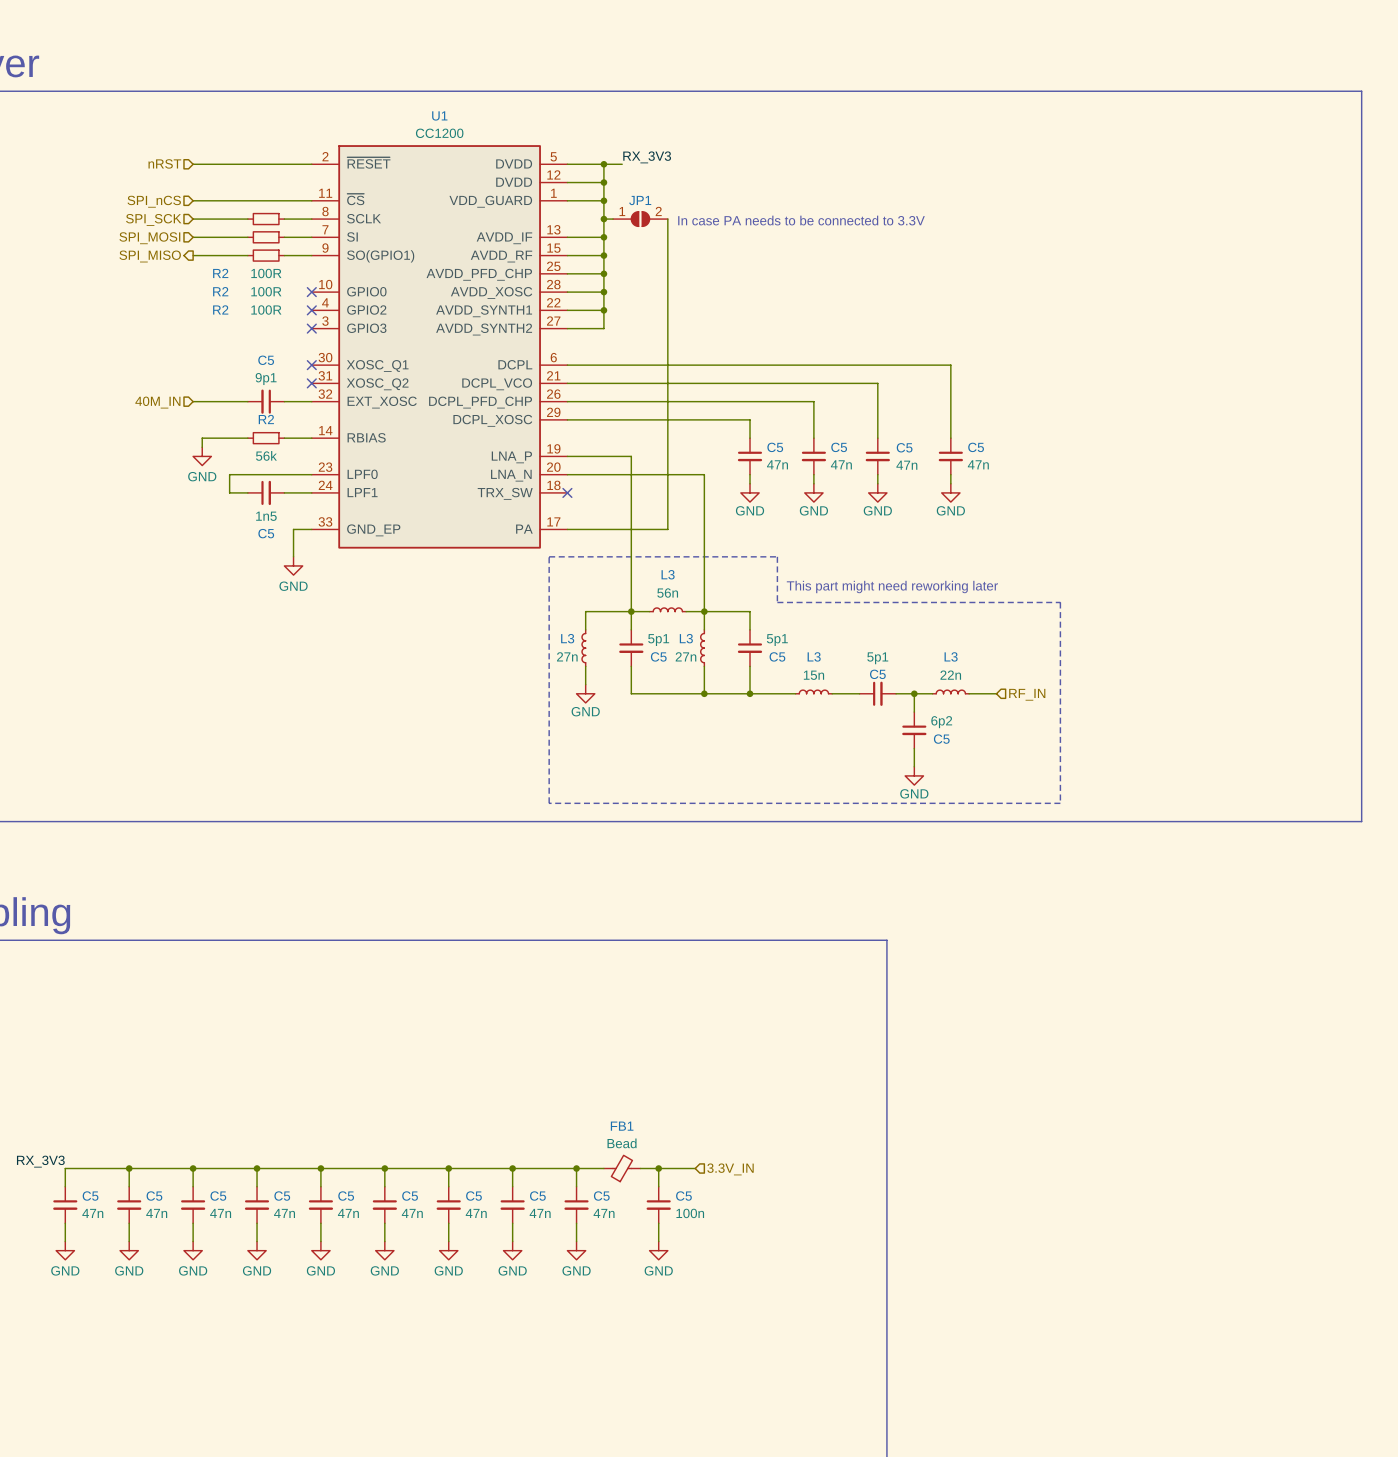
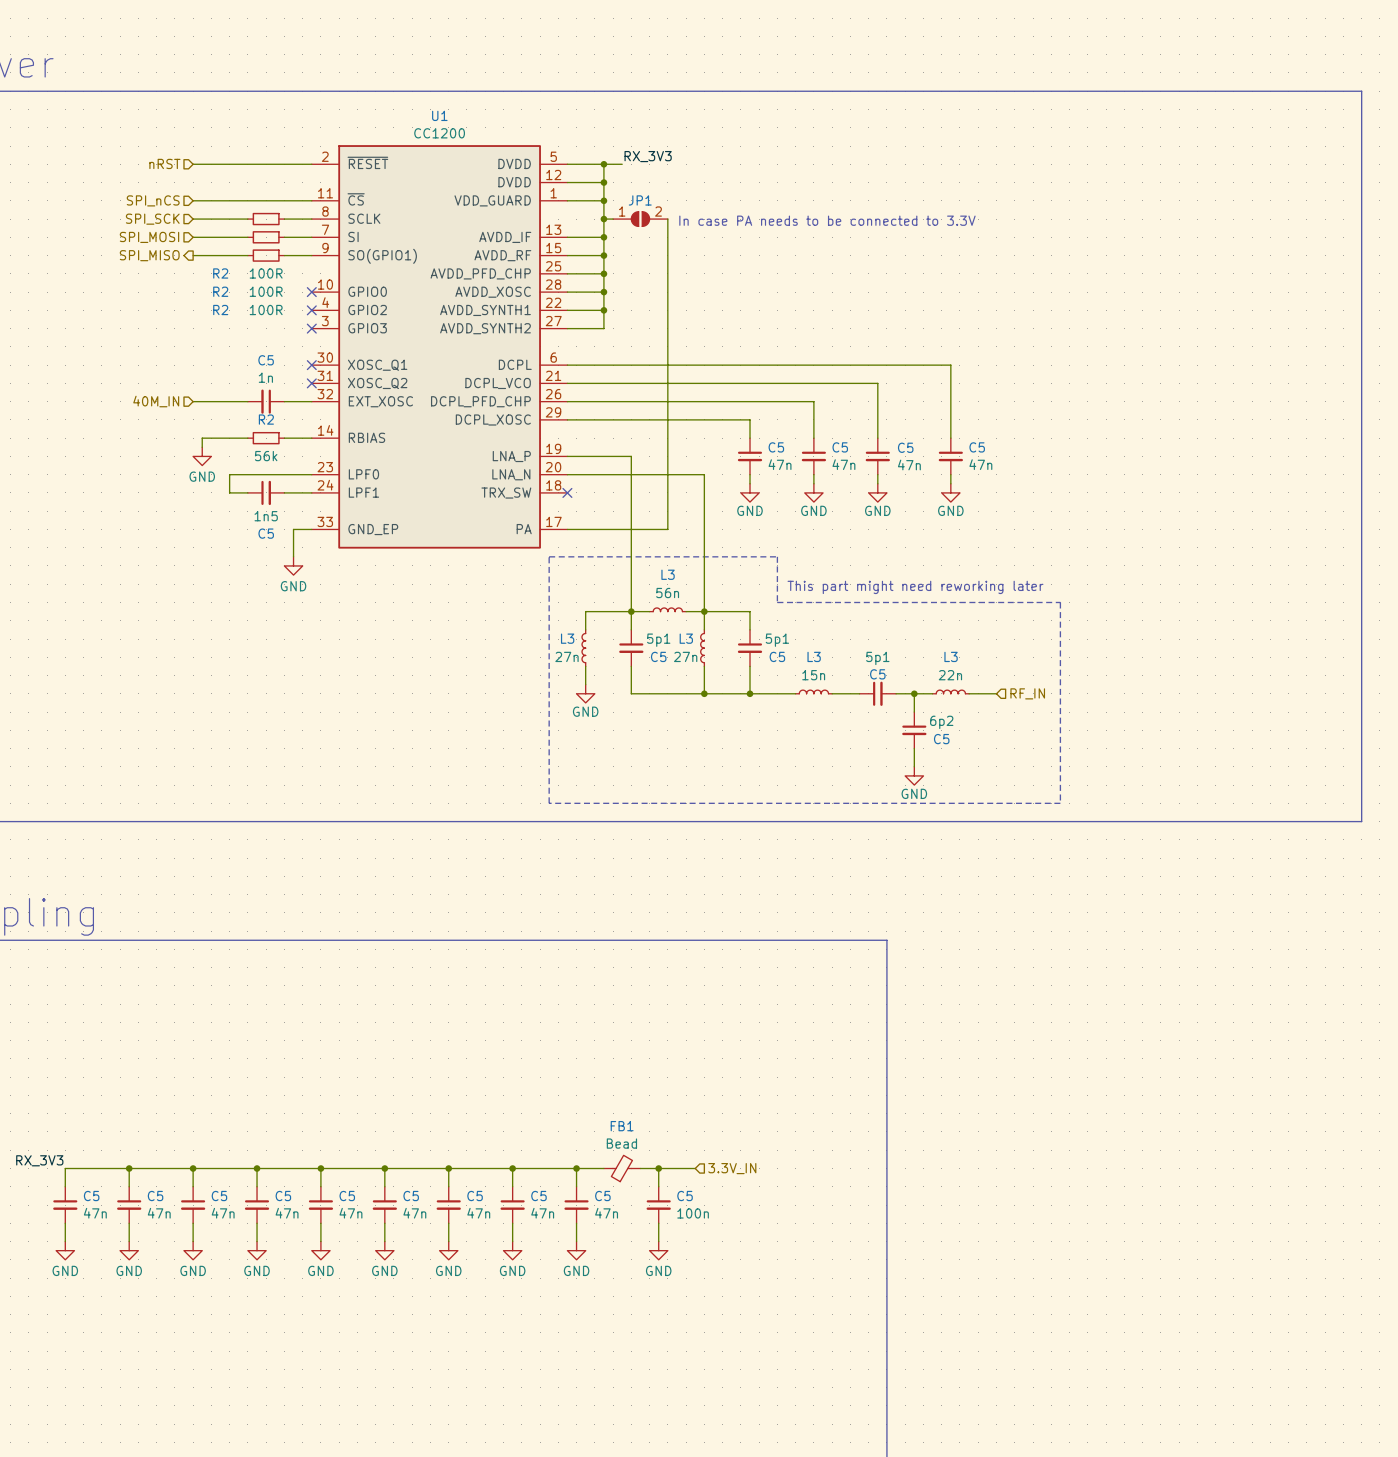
C5 value: 9p1 (266, 379) -> 1n (265, 377)

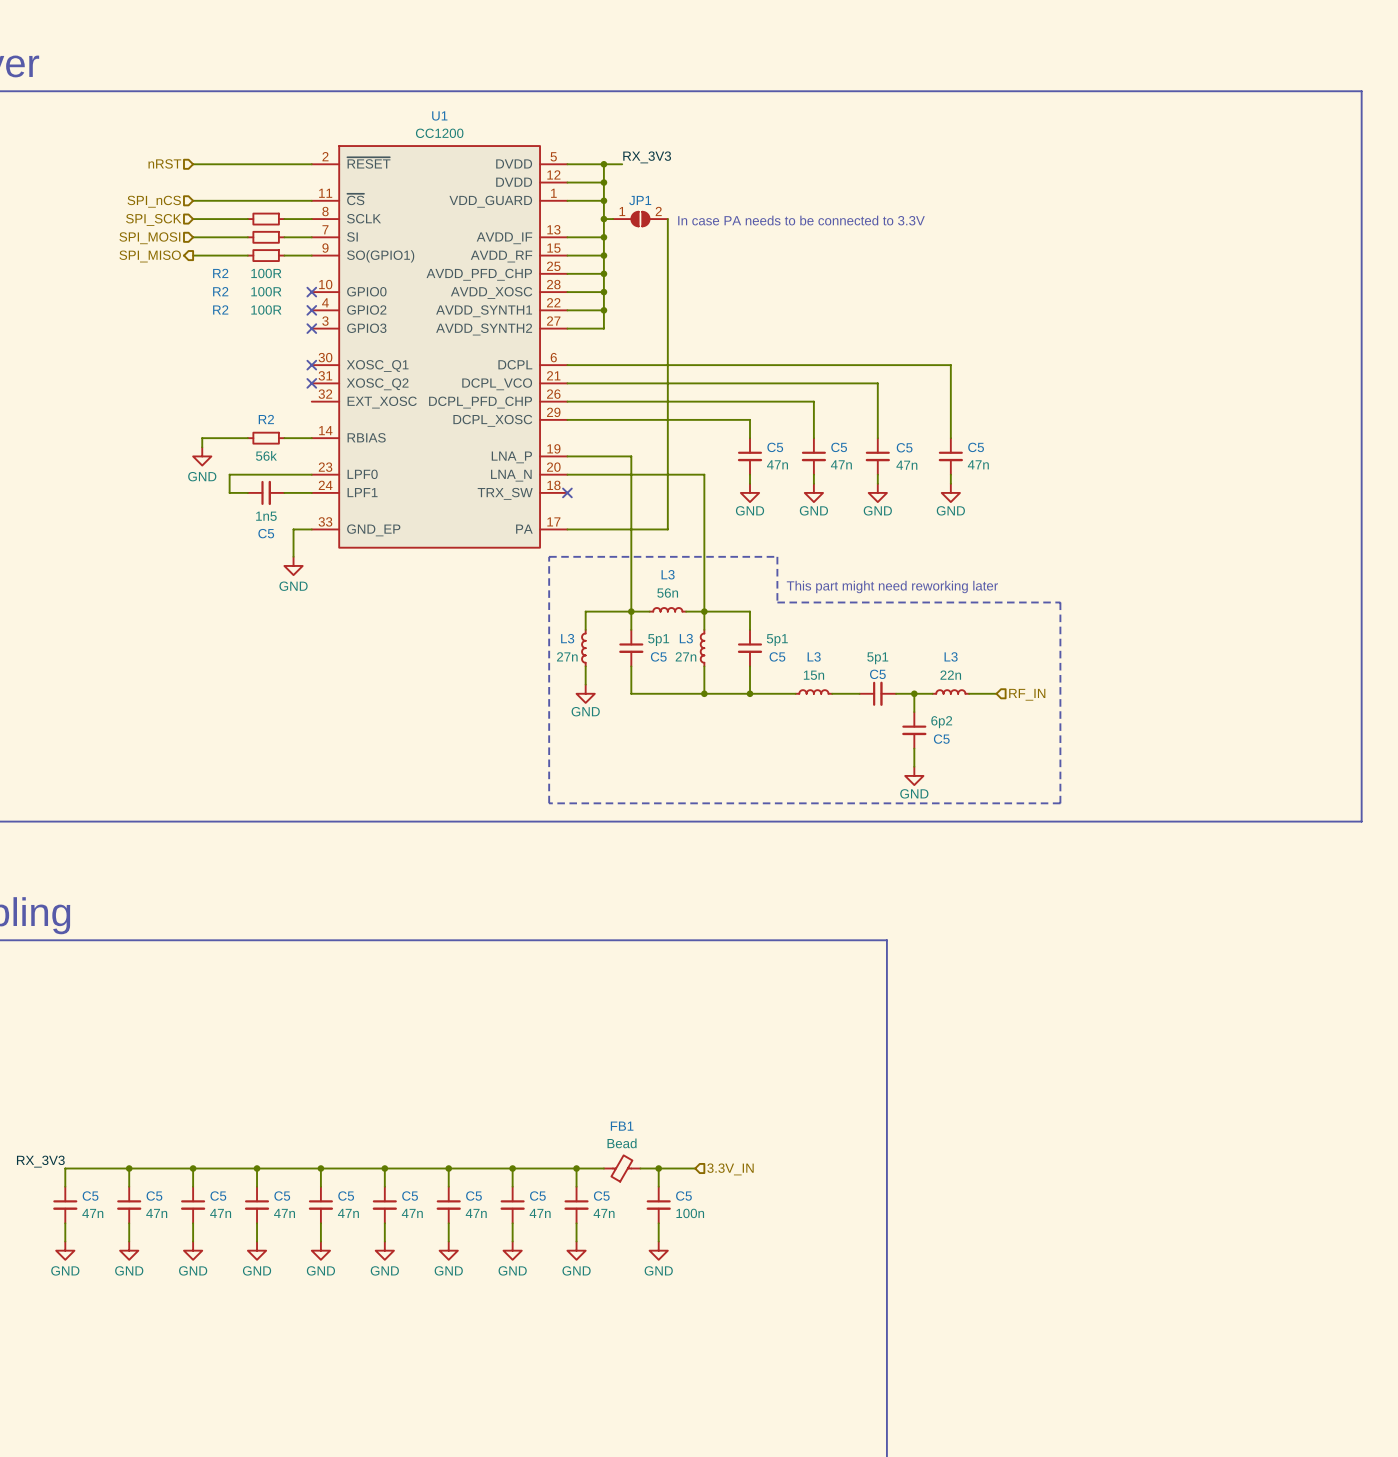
hierarchical label: 40M_IN (156, 401) -> none
wire: (193, 401) (247, 401) -> none
C5: 1n (266, 401) -> none
wire: (284, 401) (311, 401) -> none

